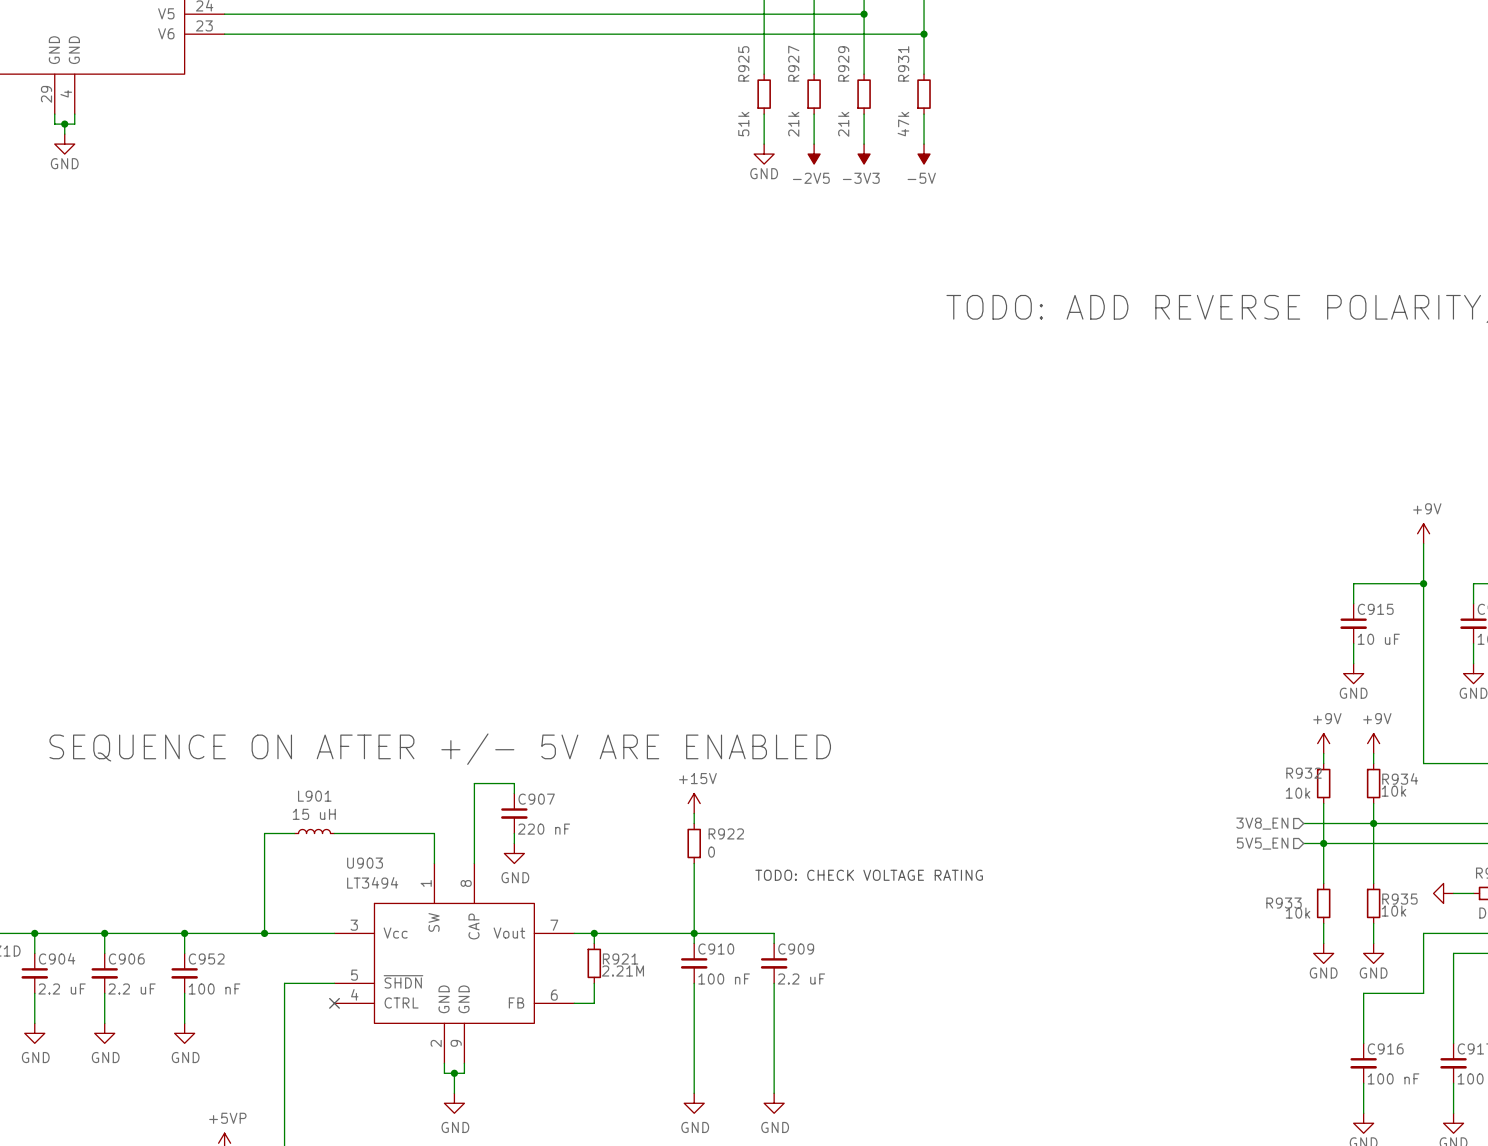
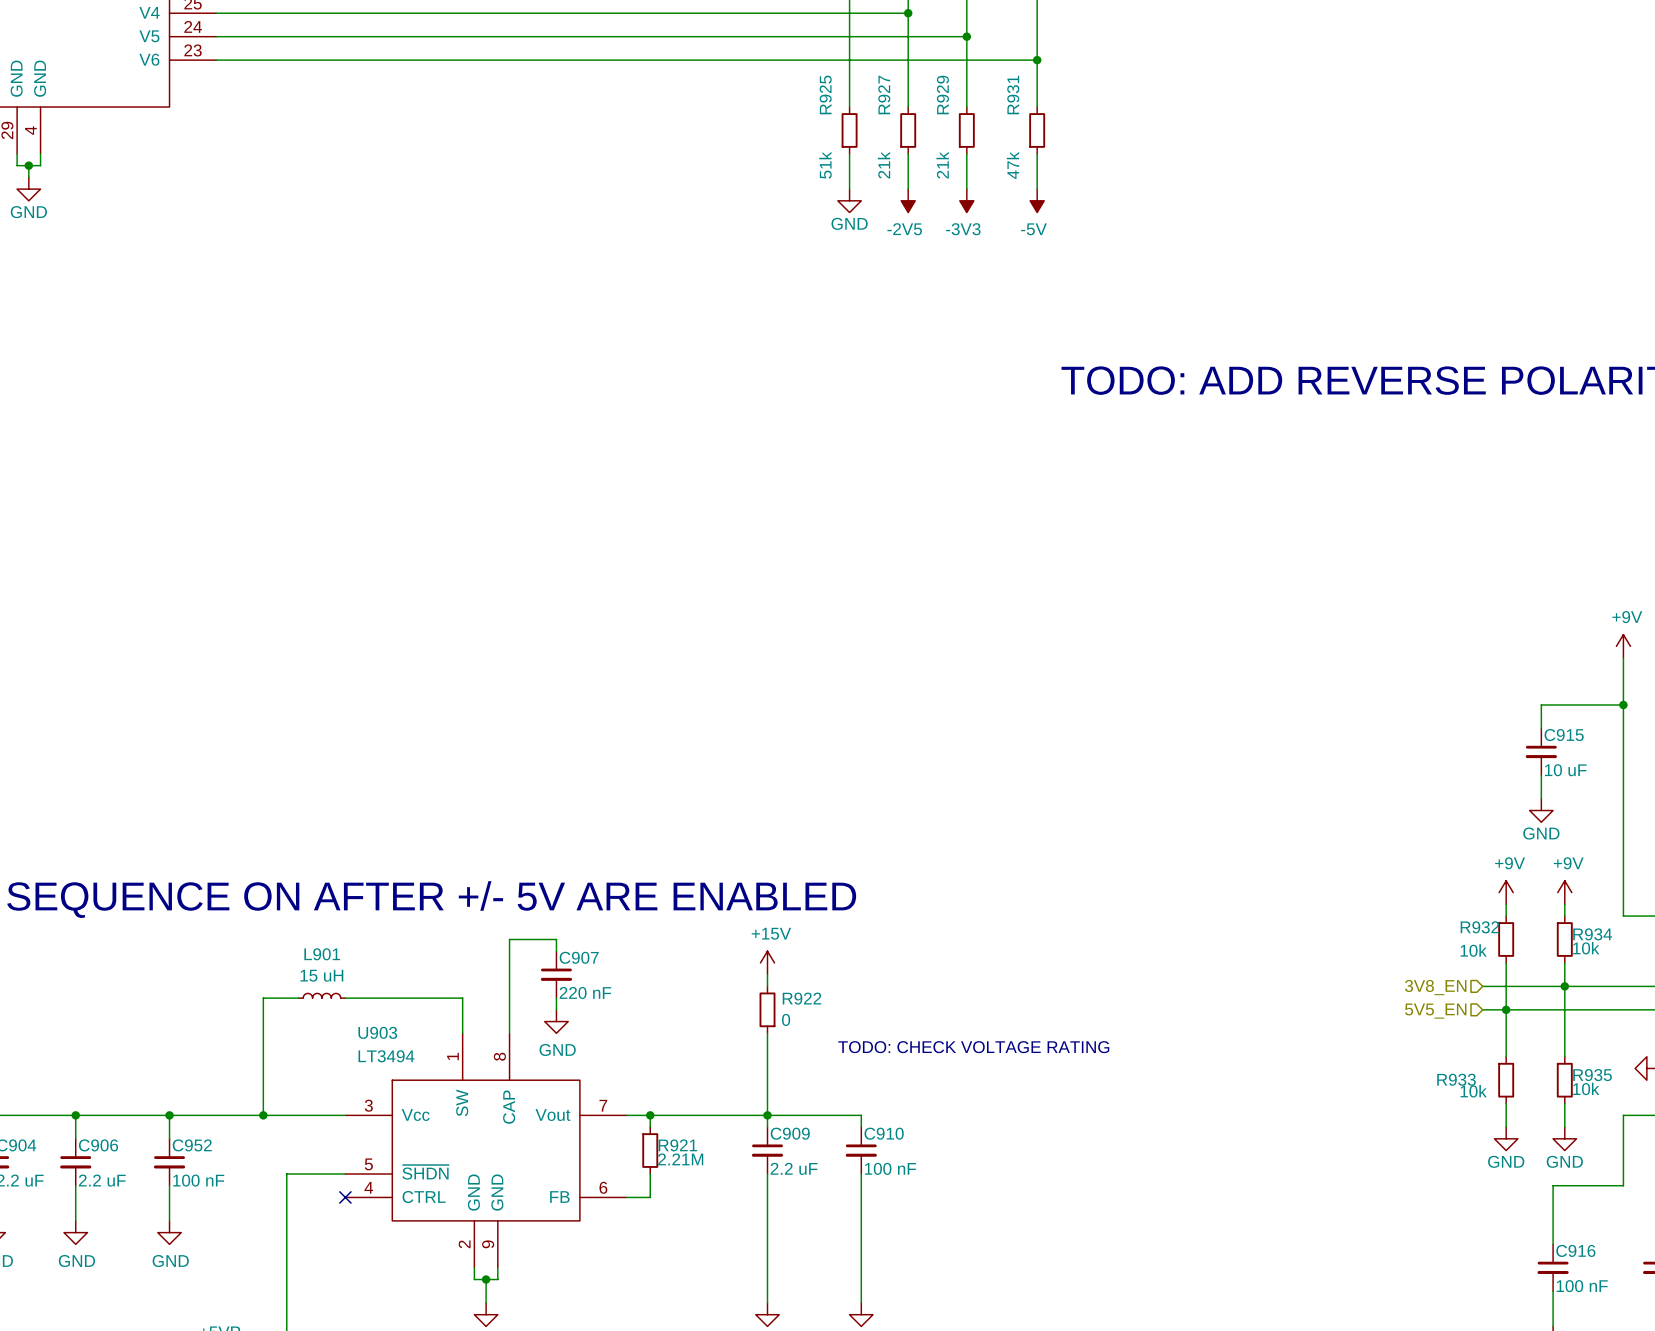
C910 name: C910 (716, 949) -> C909 (790, 1133)
C909 name: C909 (796, 949) -> C910 (884, 1133)
C910 value: 100 nF (724, 979) -> 2.2 uF (794, 1168)
C909 value: 2.2 uF (801, 979) -> 100 nF (890, 1168)

